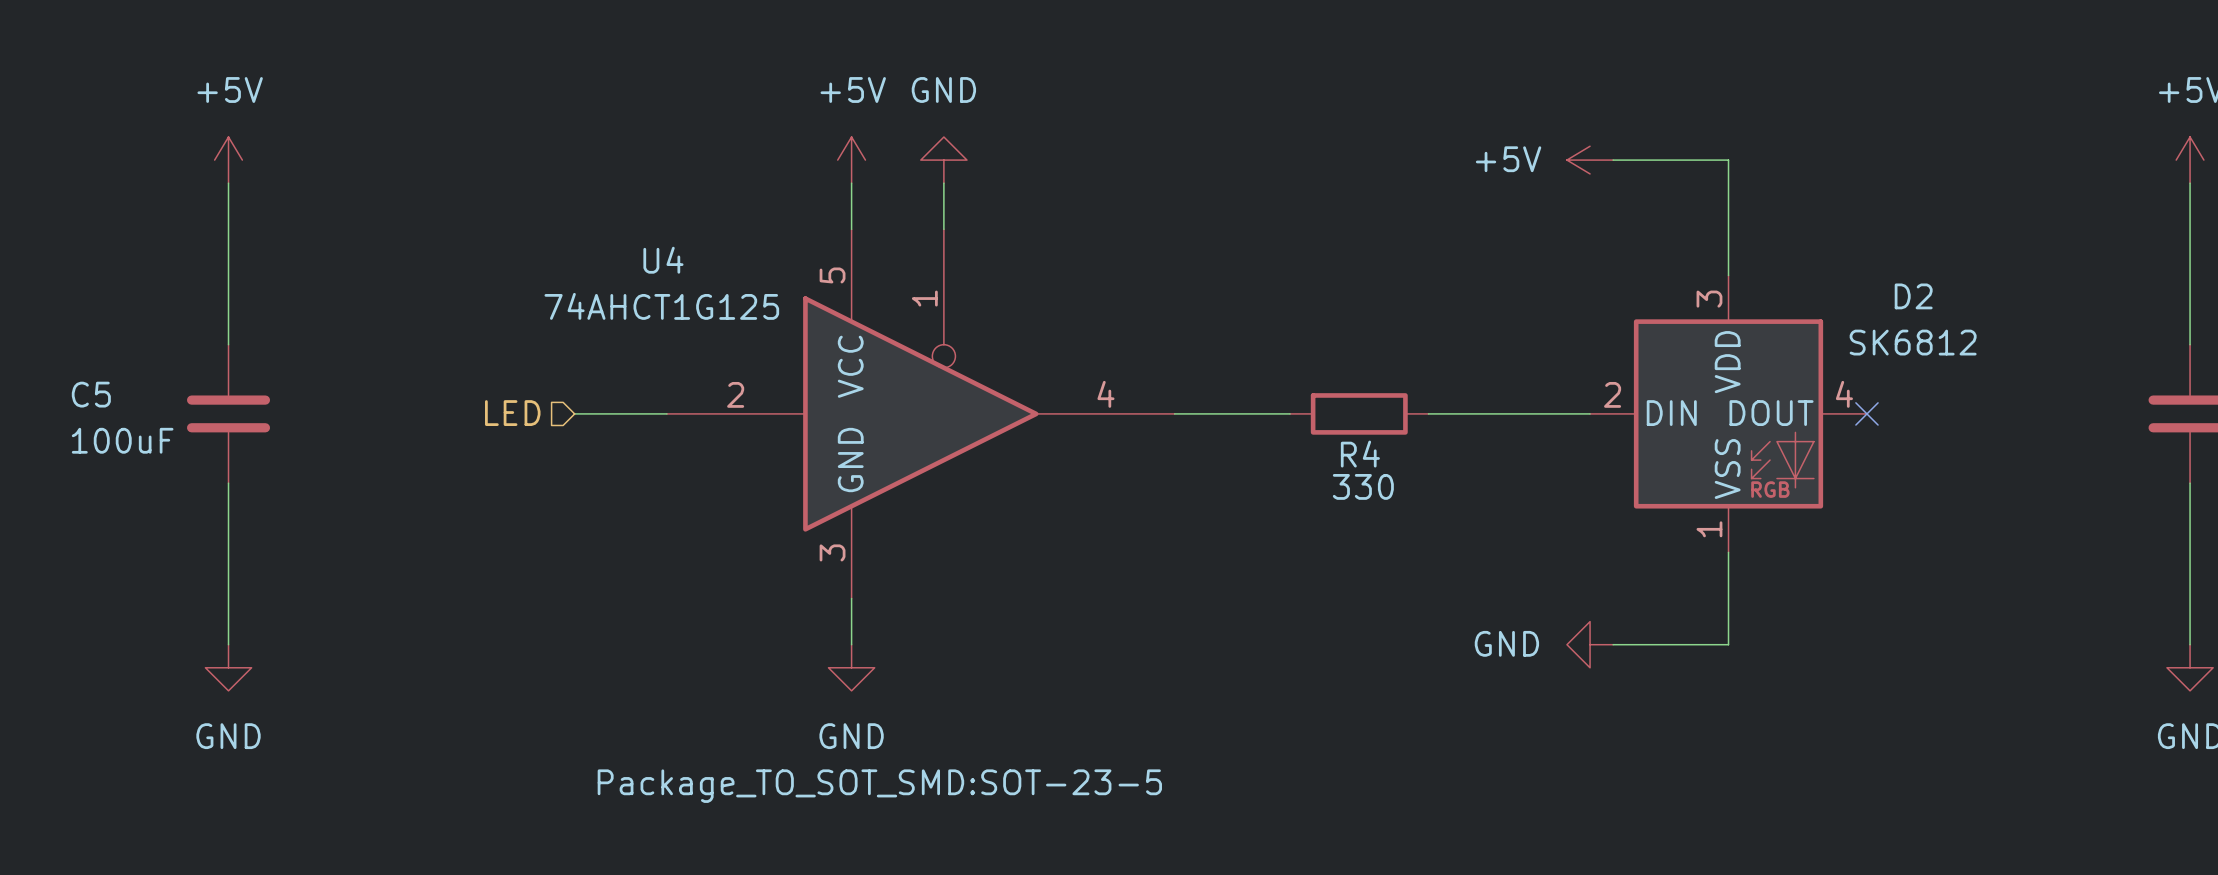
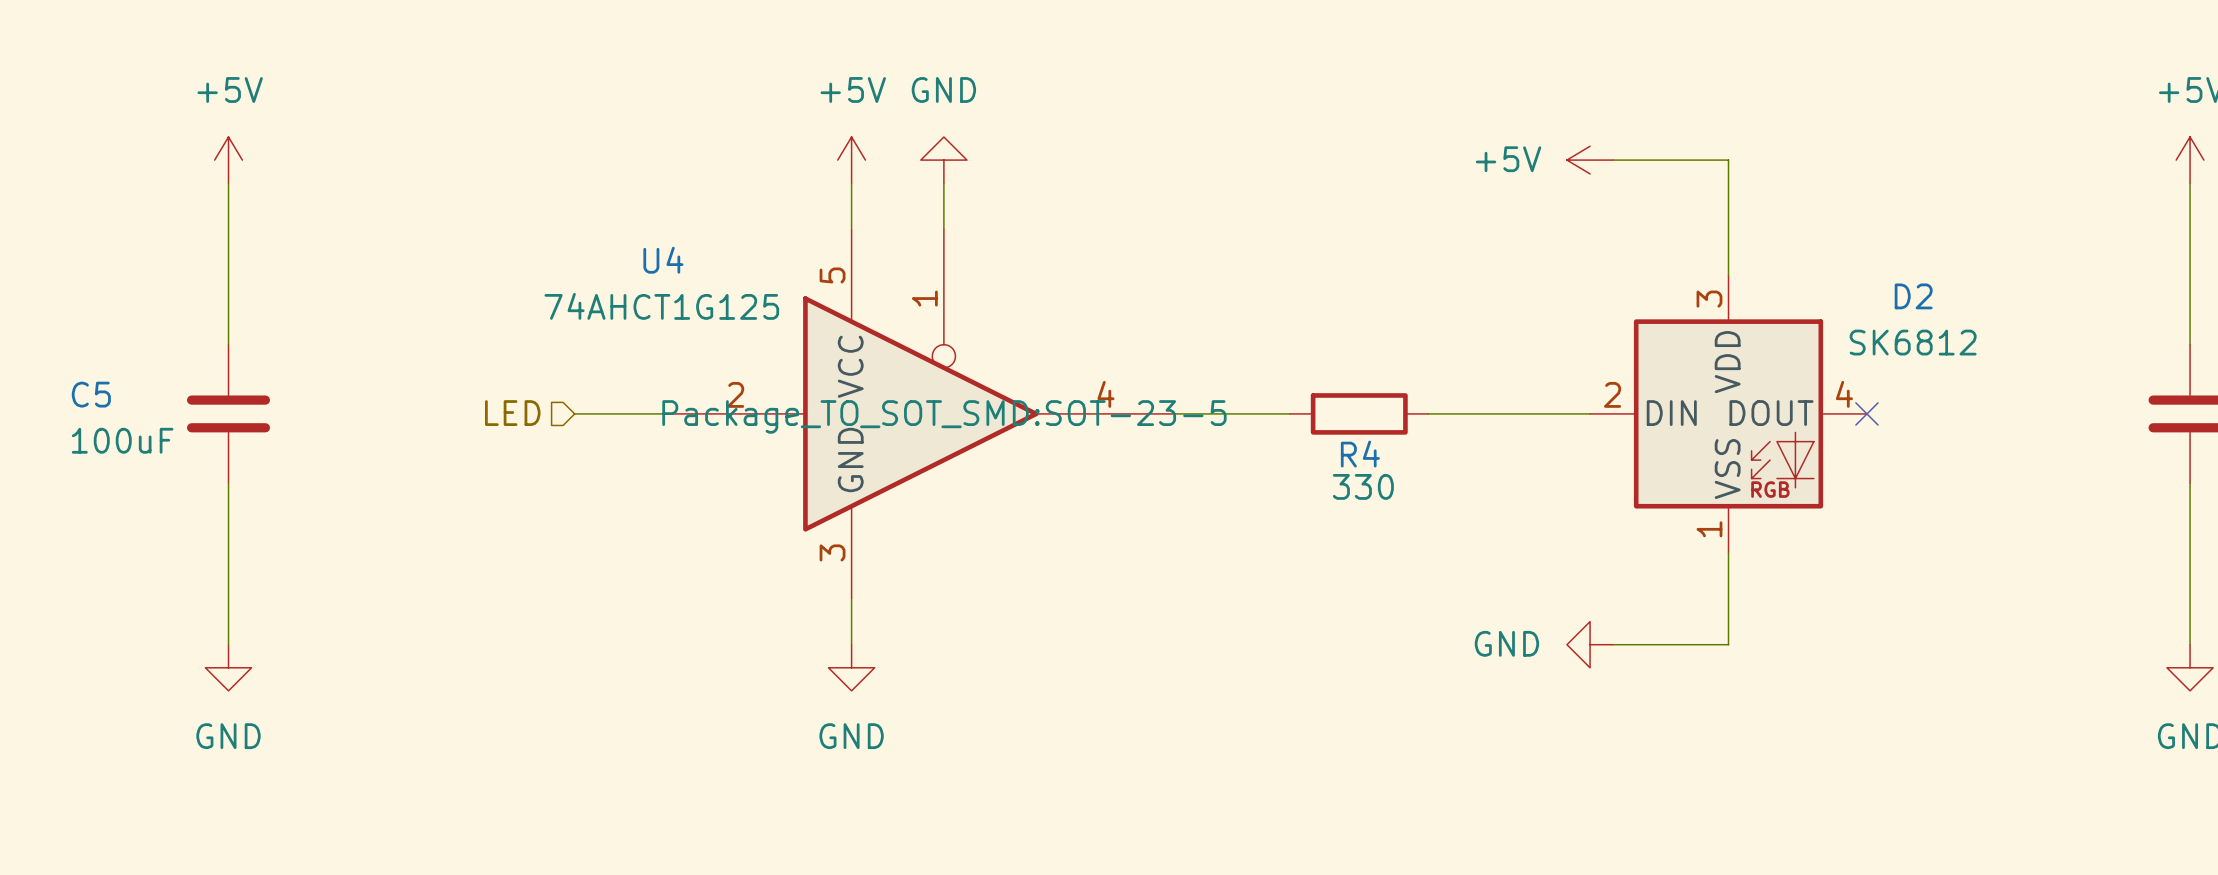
U4 text position: Package_TO_SOT_SMD:SOT-23-5 (879, 786) -> Package_TO_SOT_SMD:SOT-23-5 (944, 416)

